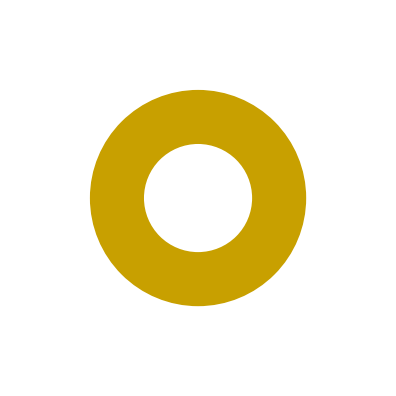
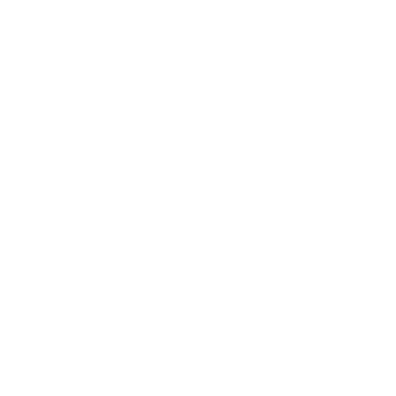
part: (198, 198) -> none

